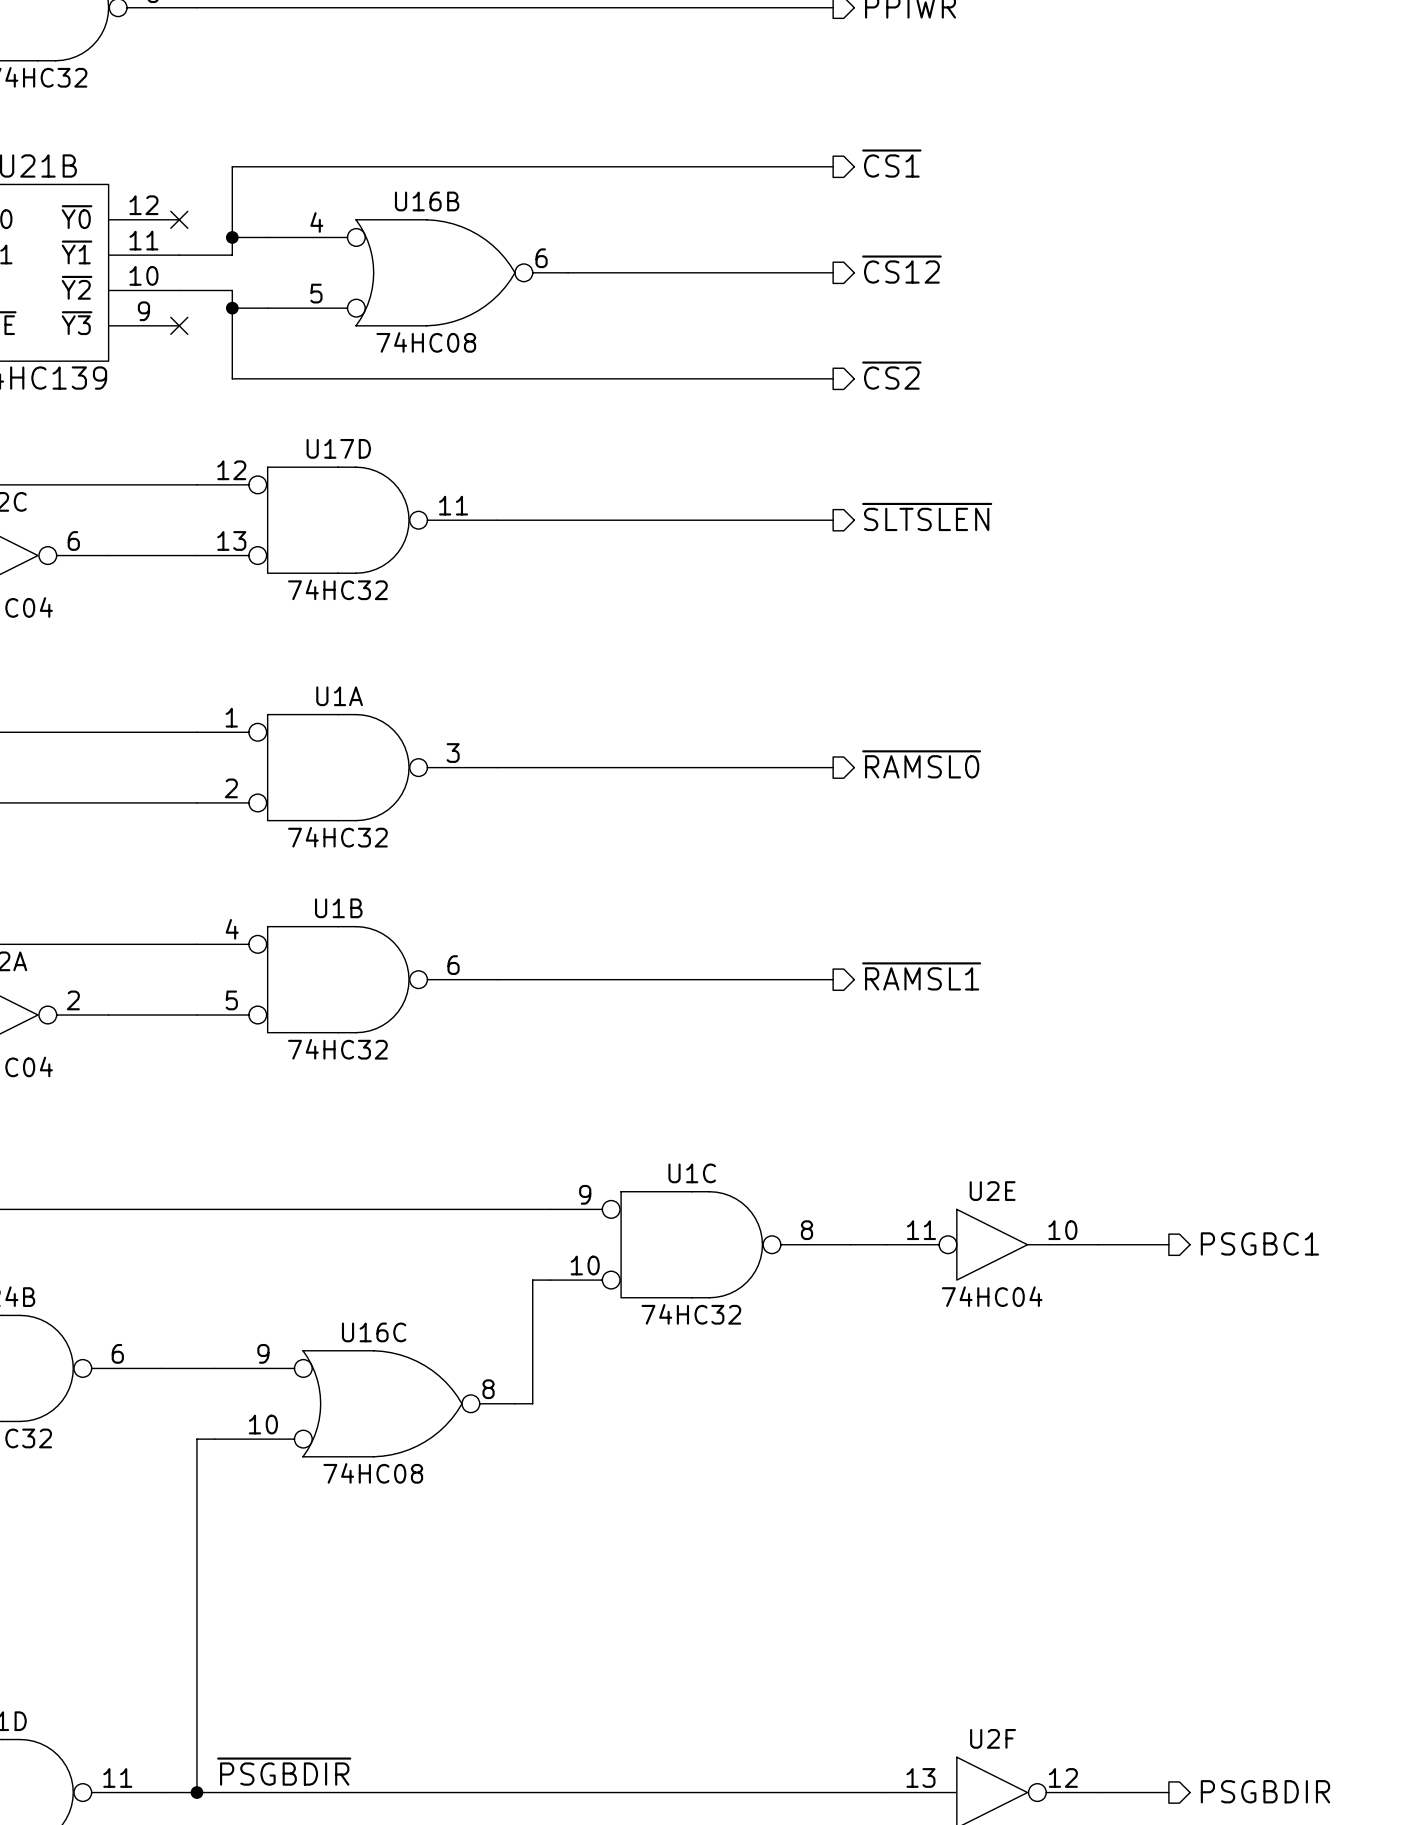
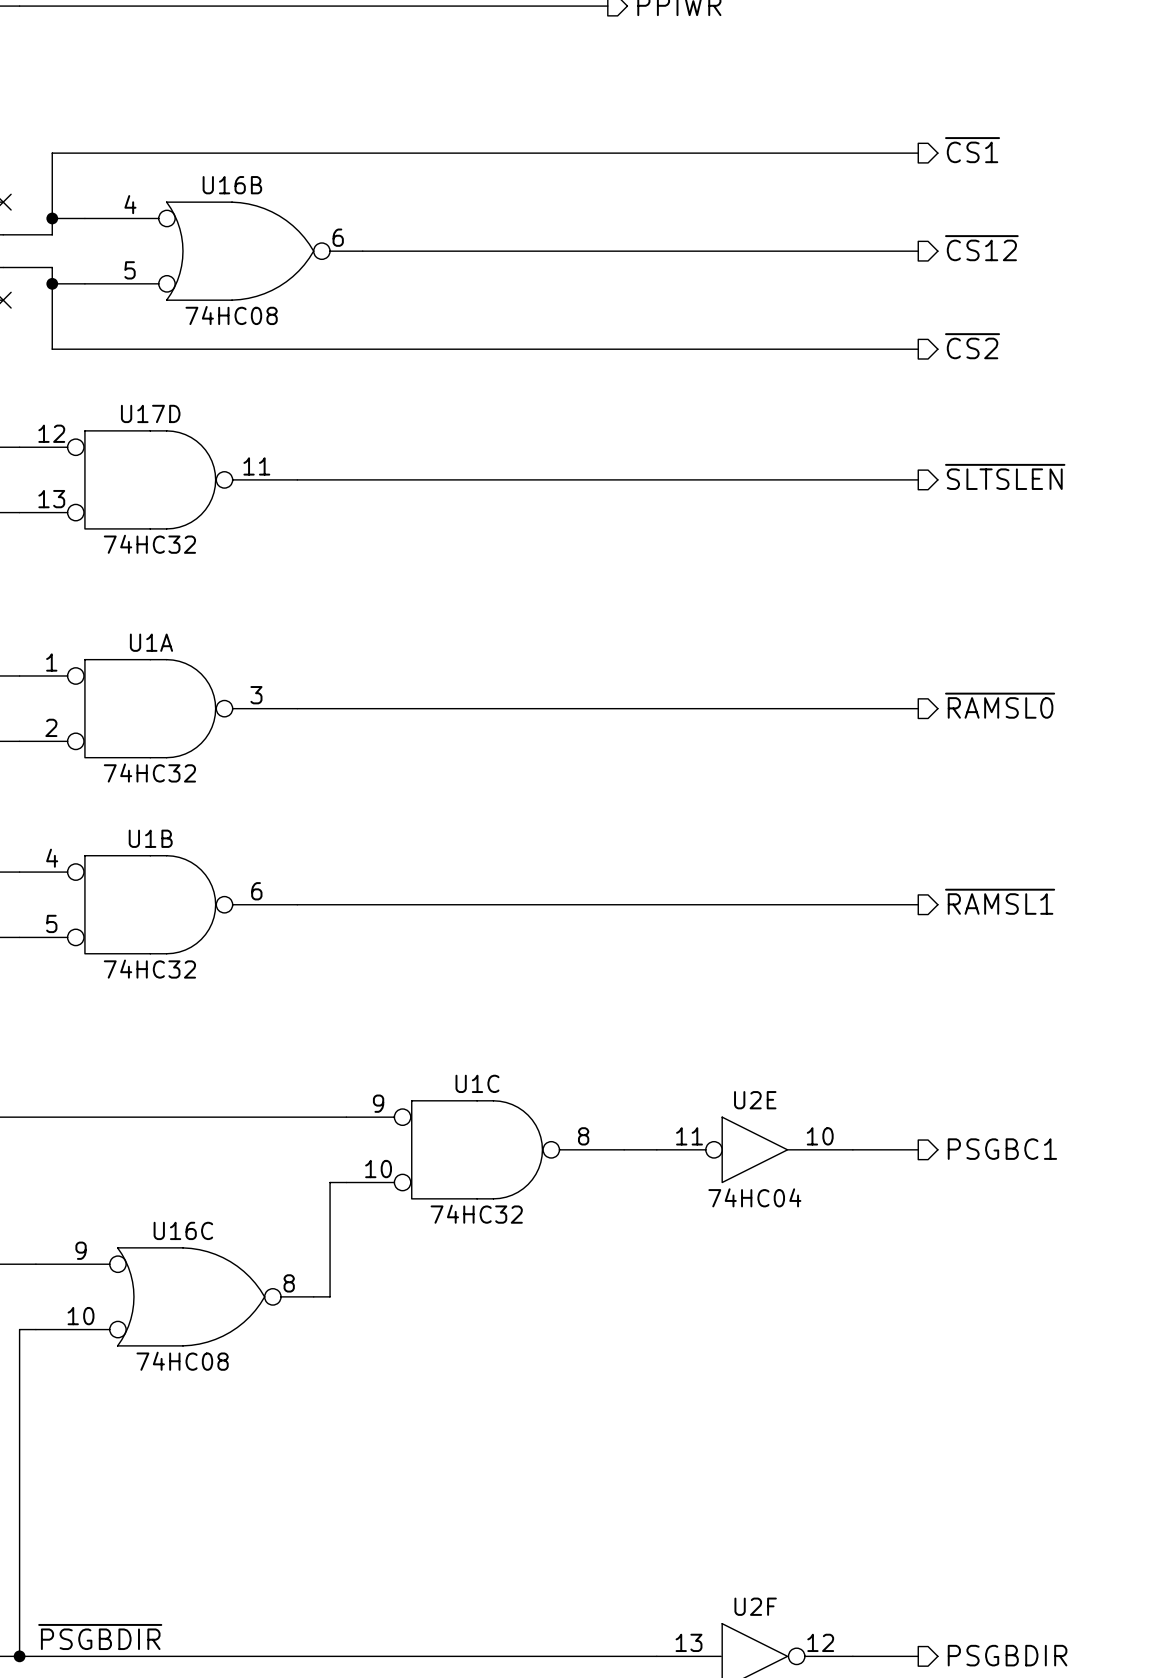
hierarchical label position: ~{CS1} (891, 163) -> ~{CS1} (972, 150)
wire: none -> (607, 153) (918, 153)
hierarchical label position: ~{CS12} (901, 269) -> ~{CS12} (981, 248)
wire: none -> (607, 251) (918, 251)
hierarchical label position: ~{CS2} (891, 375) -> ~{CS2} (972, 346)
wire: none -> (607, 349) (918, 349)
hierarchical label position: ~{SLTSLEN} (927, 516) -> ~{SLTSLEN} (1005, 476)
wire: none -> (607, 479) (918, 479)
hierarchical label position: ~{RAMSL0} (921, 764) -> ~{RAMSL0} (1000, 705)
wire: none -> (607, 708) (918, 708)
hierarchical label position: ~{RAMSL1} (921, 976) -> ~{RAMSL1} (1000, 901)
wire: none -> (607, 904) (918, 904)

